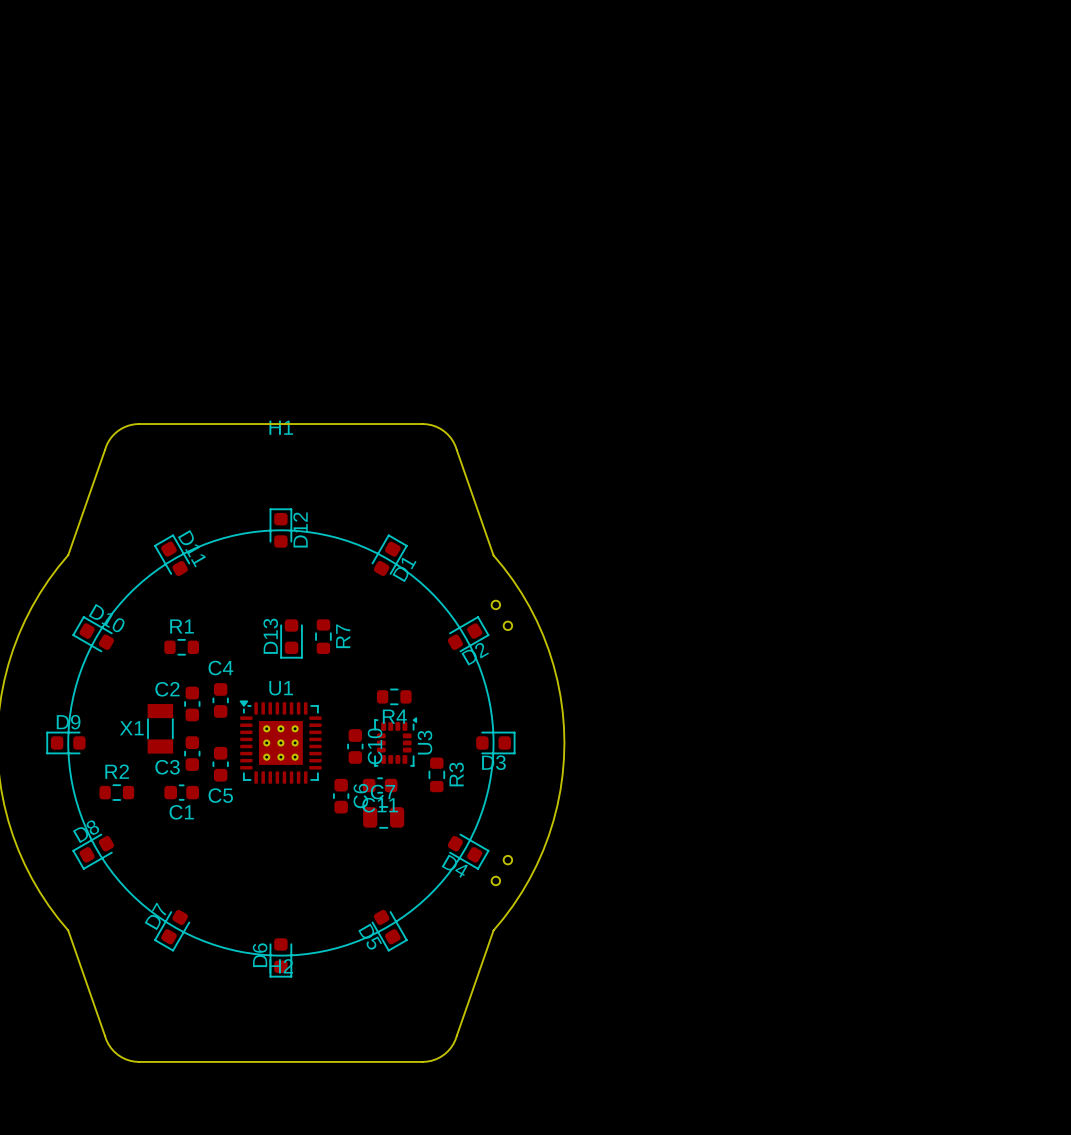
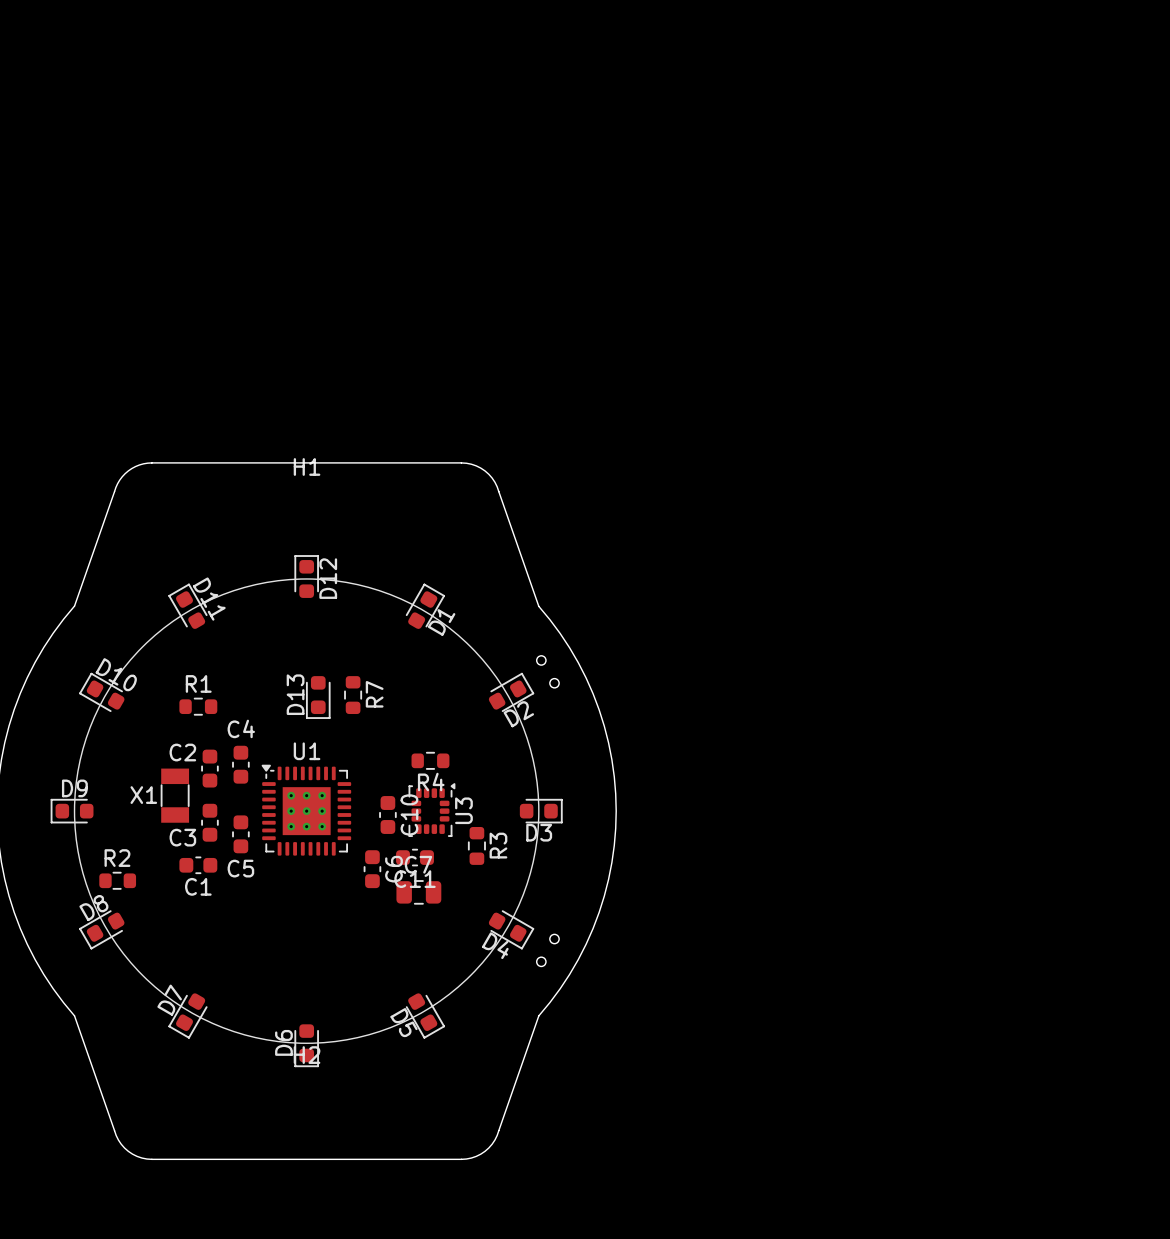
R2 footprint: [99, 784, 135, 801] -> [99, 871, 137, 890]

